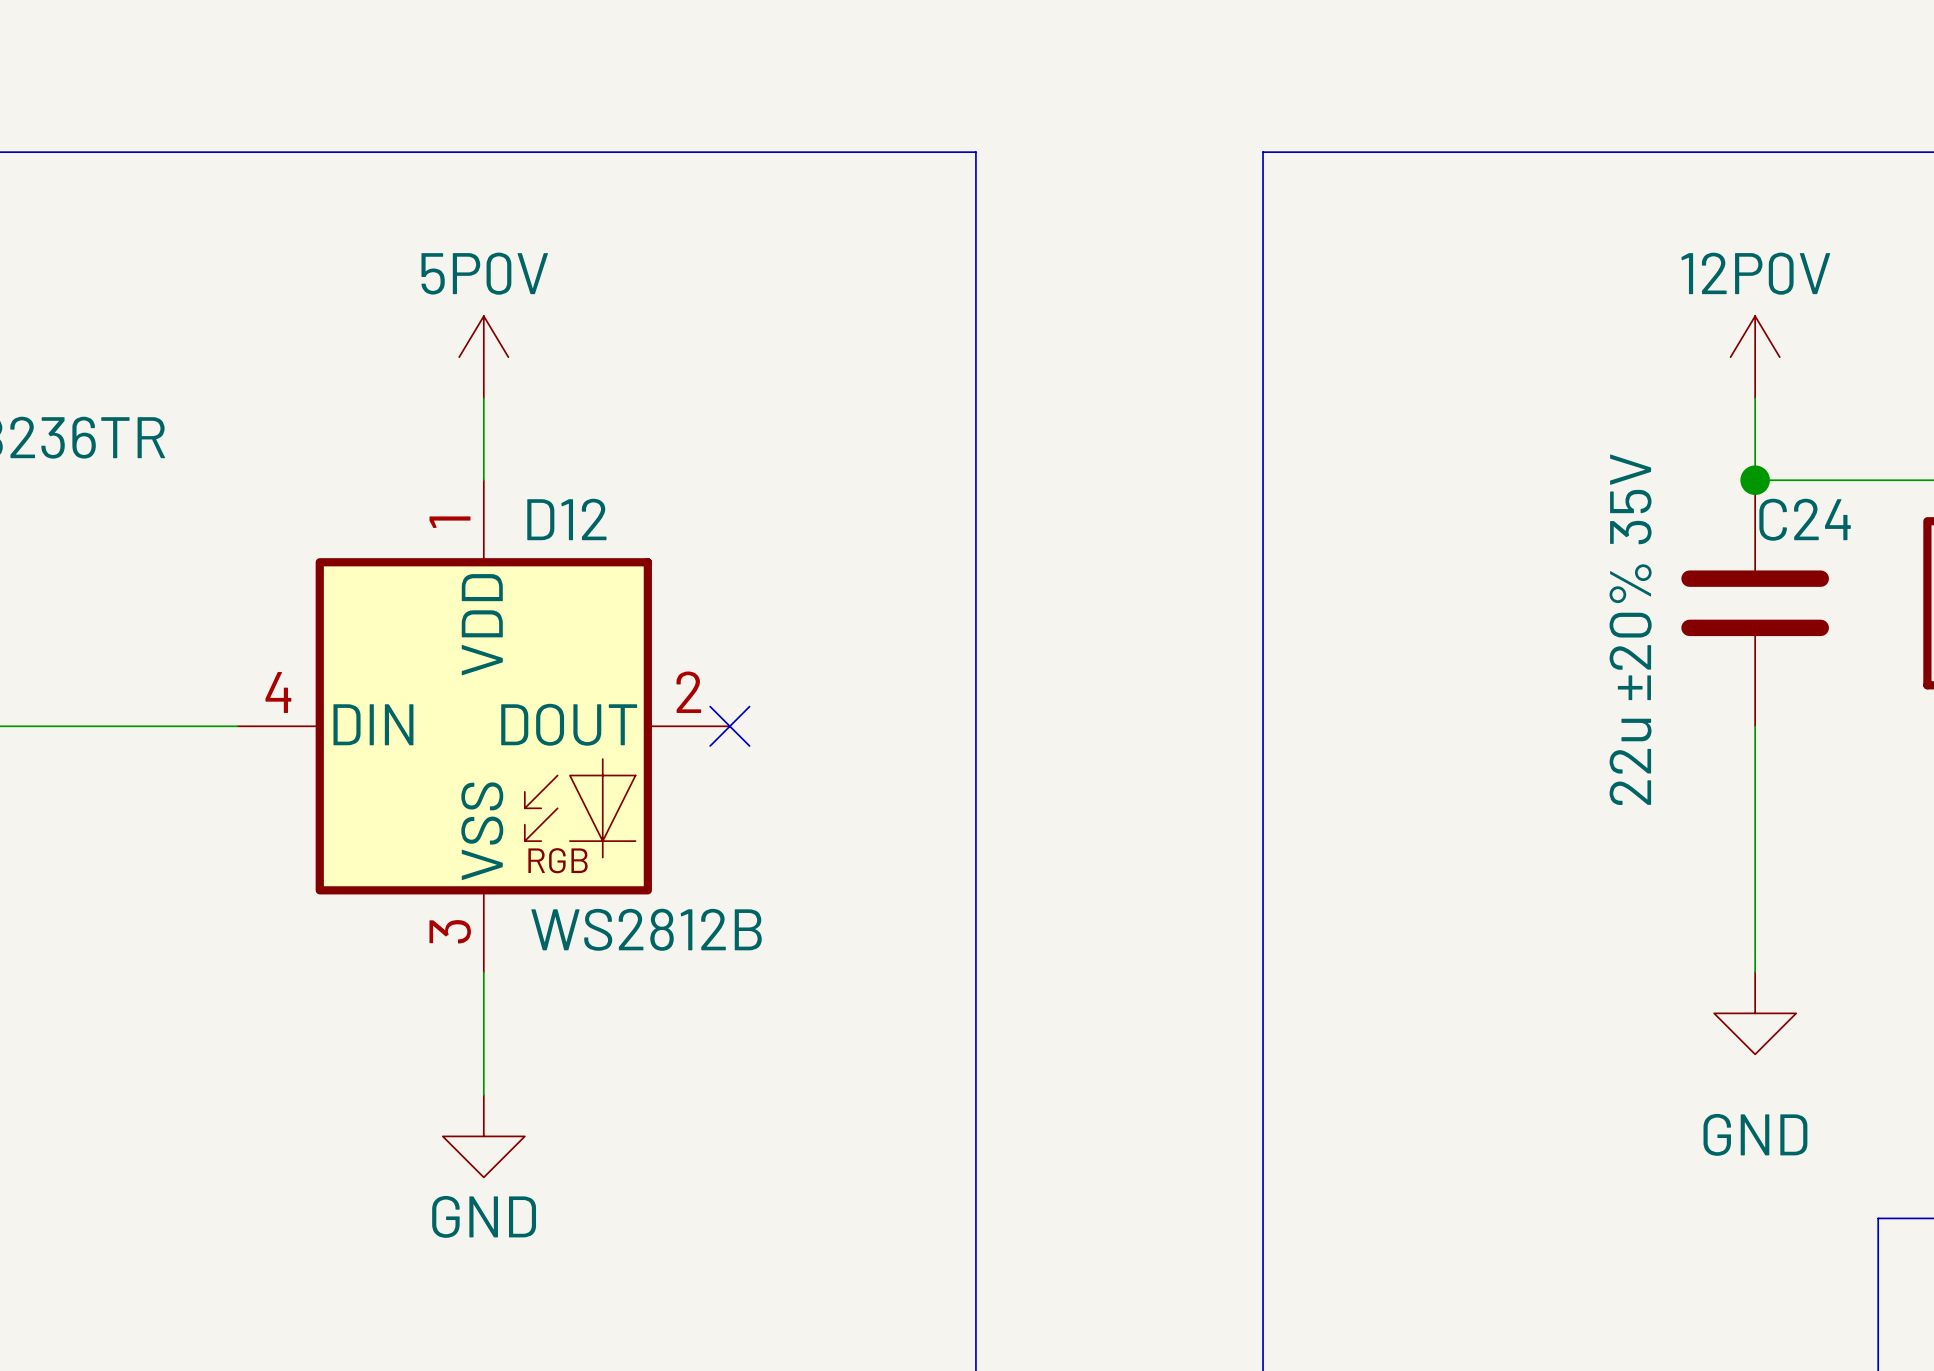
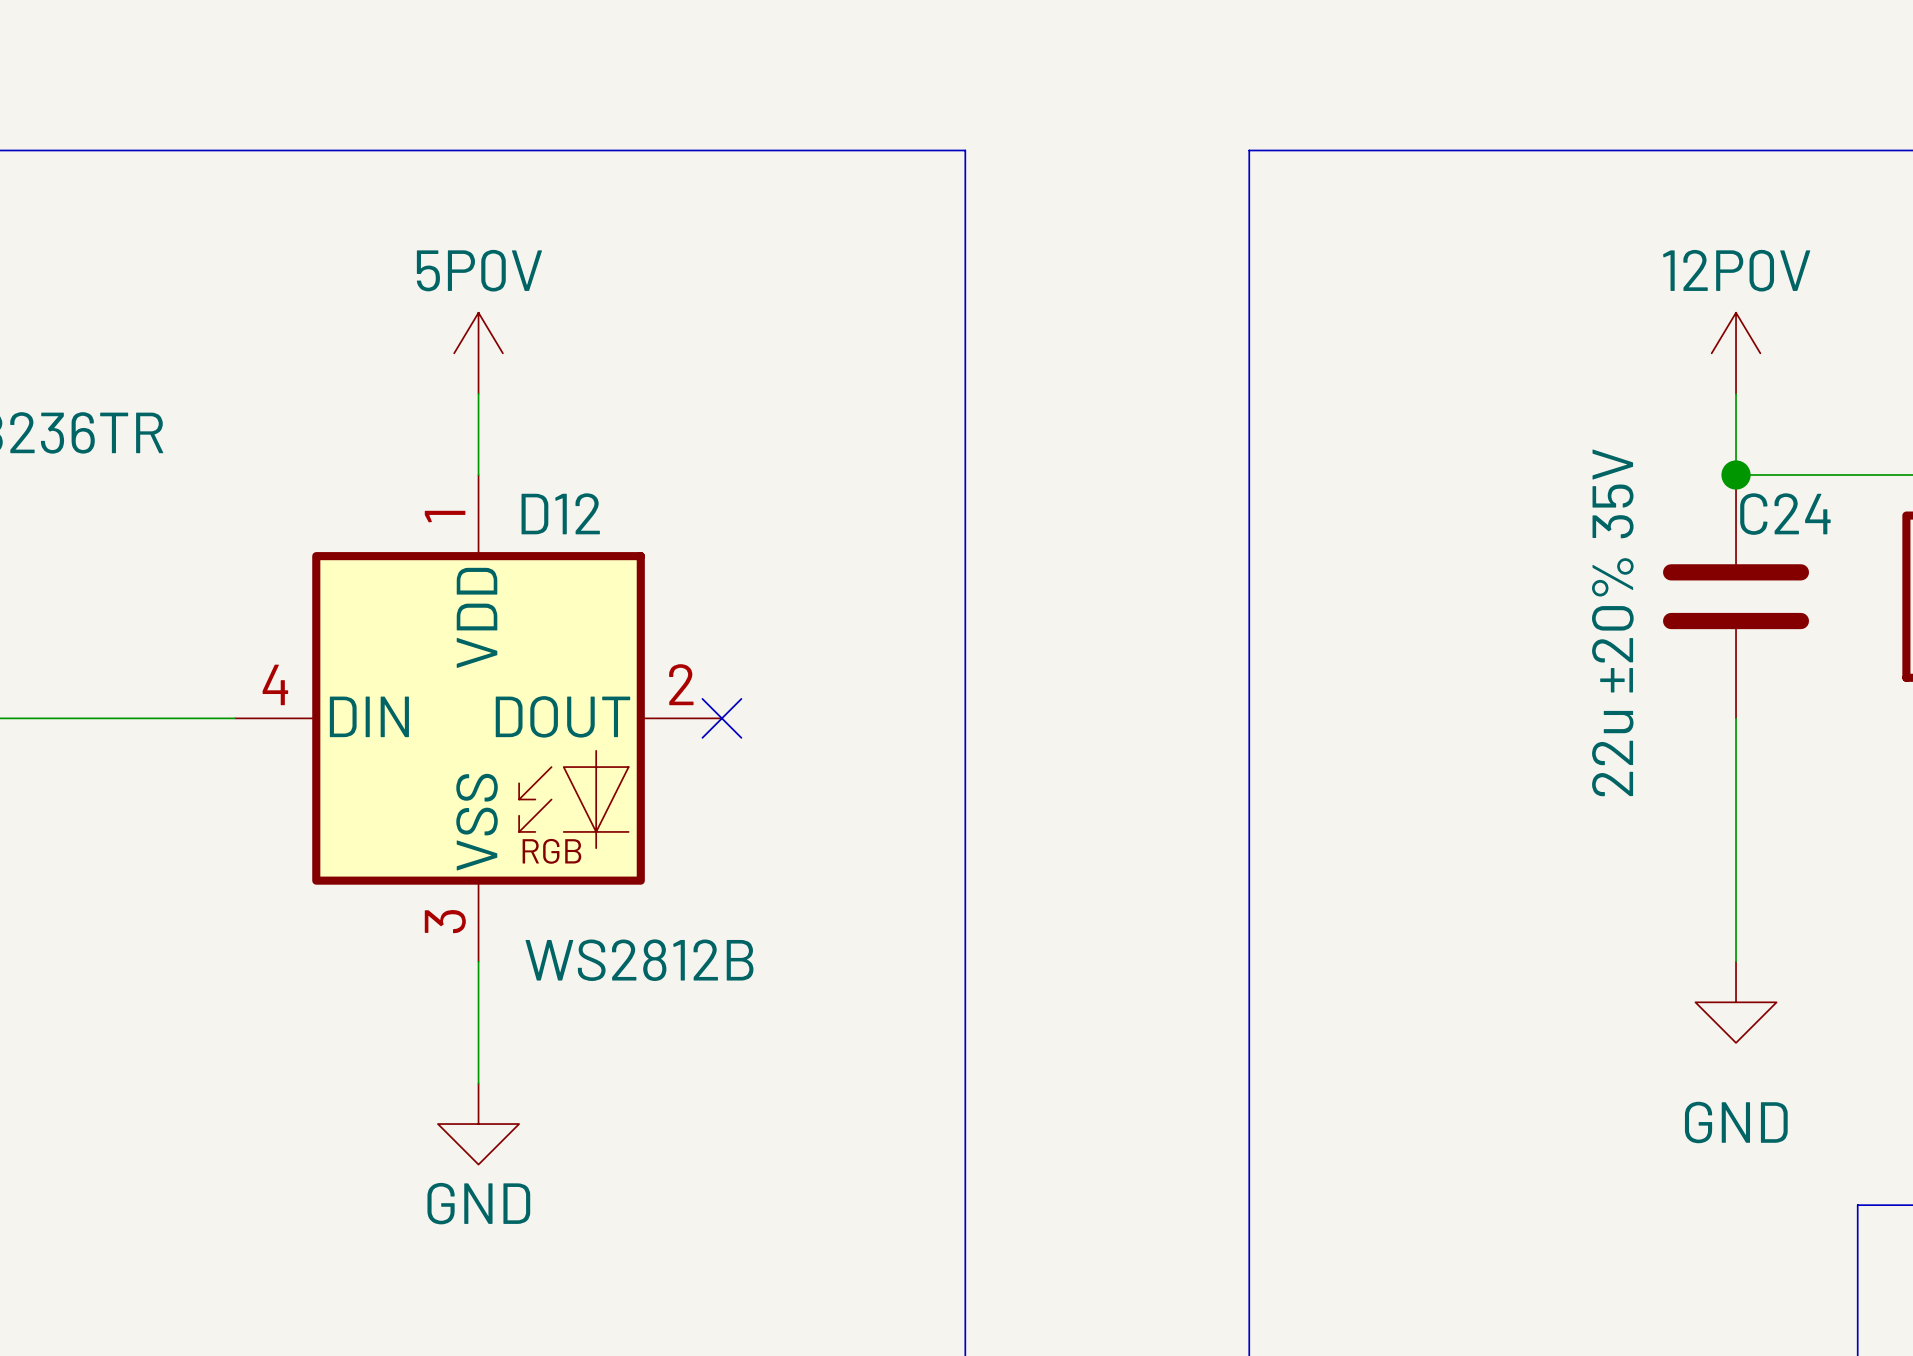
D12 value position: WS2812B (646, 929) -> WS2812B (639, 960)

